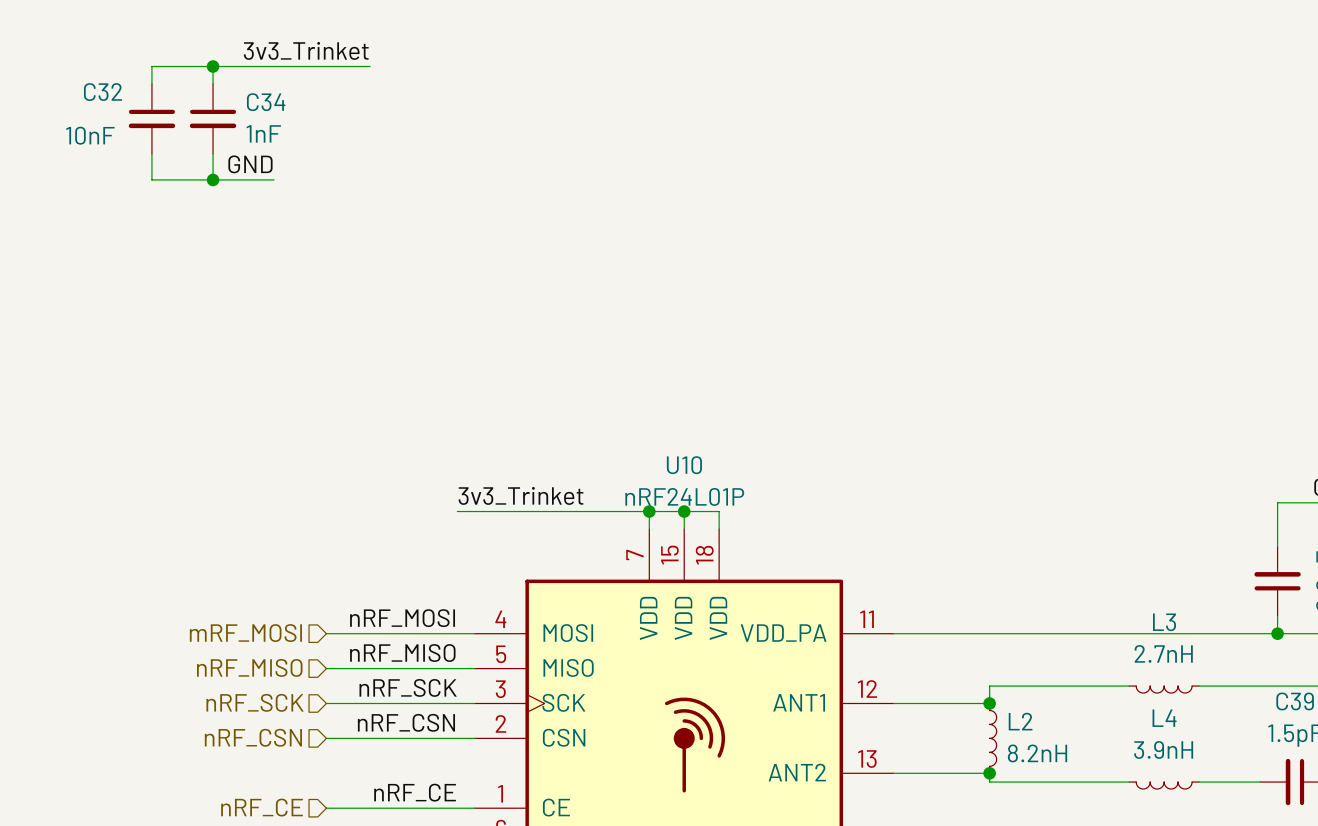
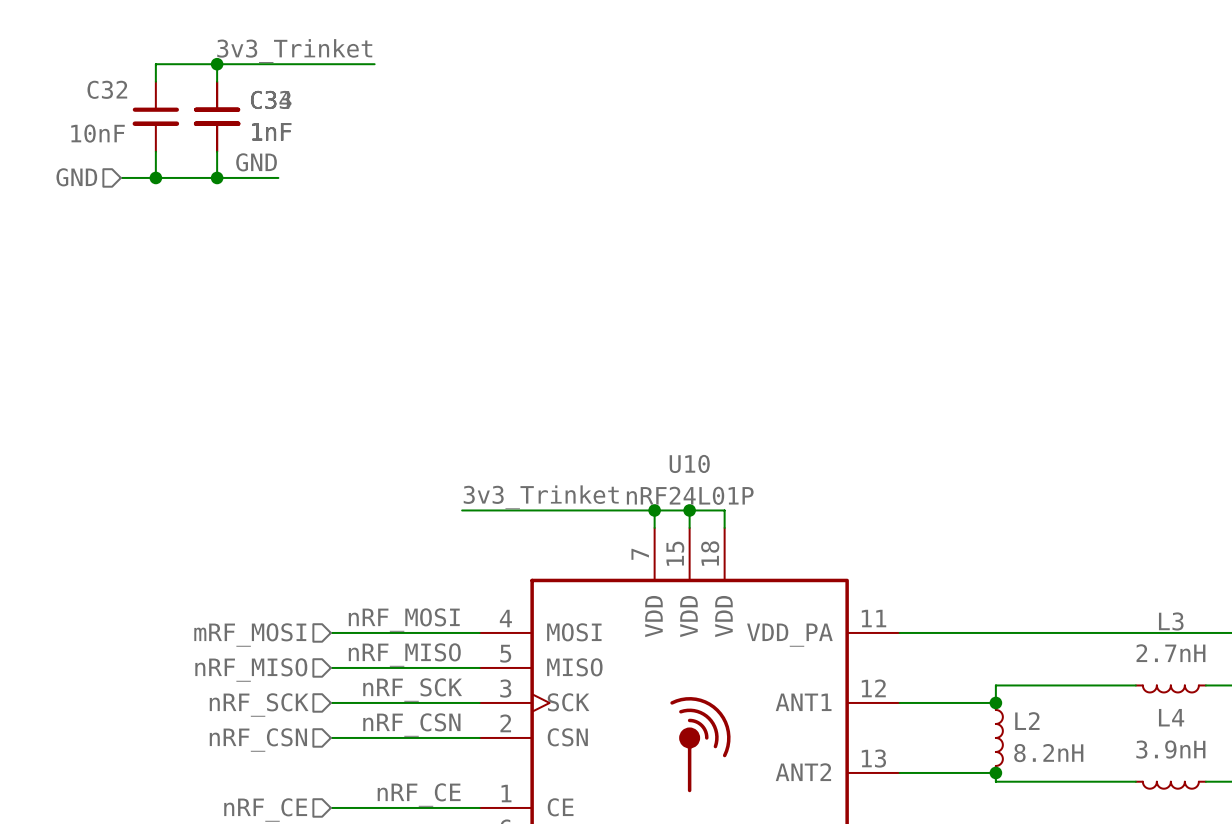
part: none -> 1nF (217, 116)
hierarchical label: none -> GND (76, 177)
wire: none -> (120, 177) (155, 177)
junction: none -> (155, 177)

